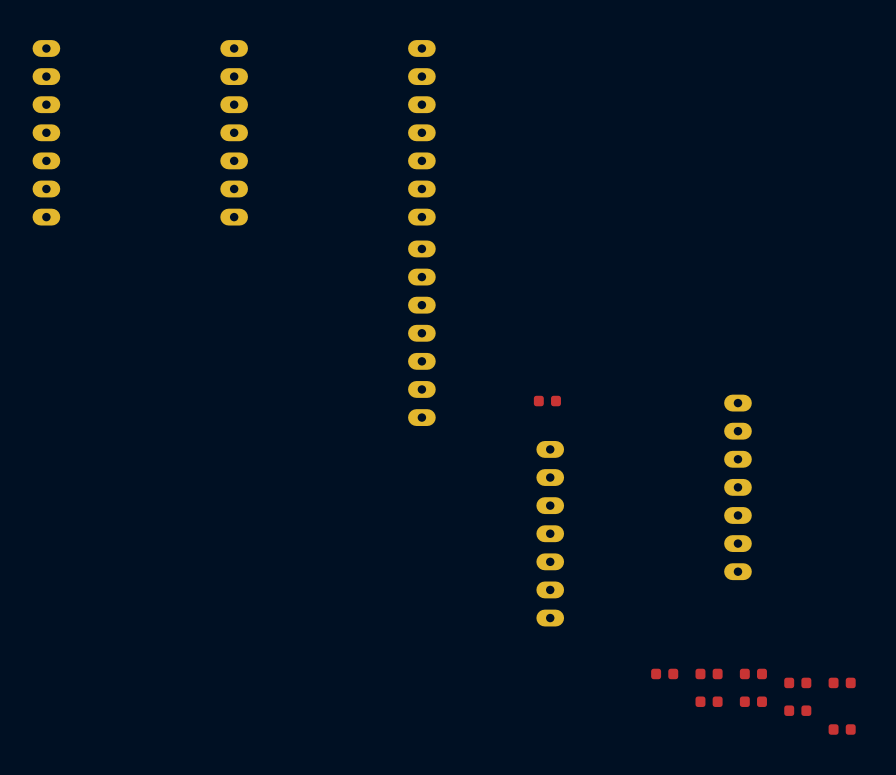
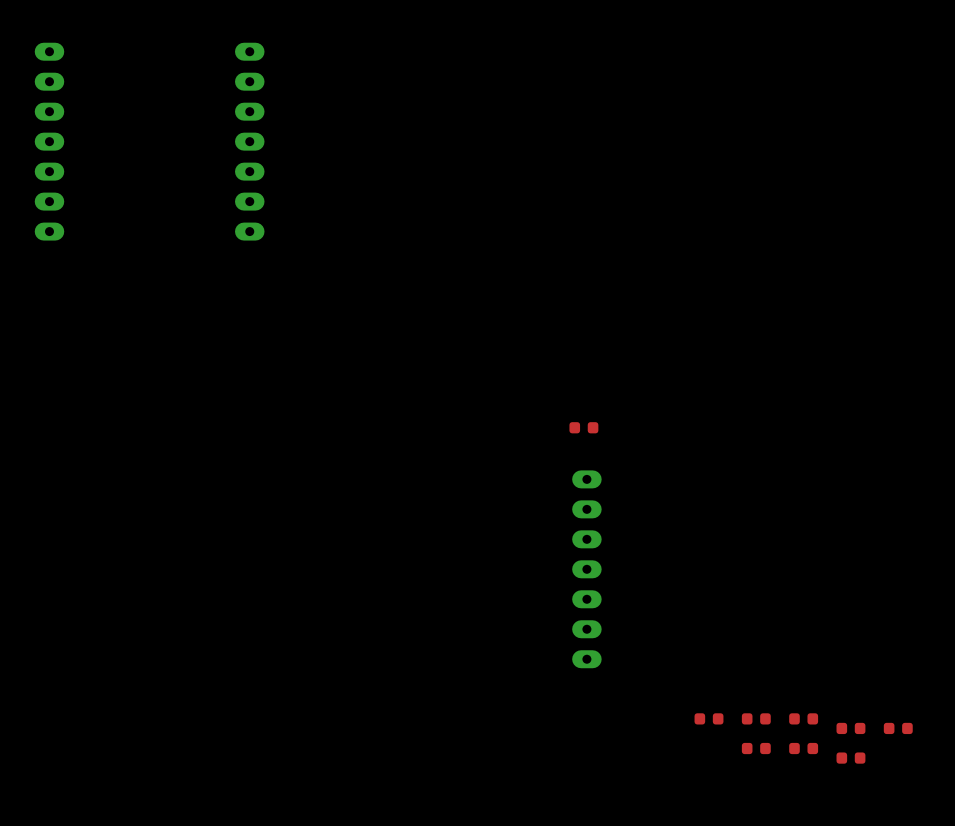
part: (421, 132) -> none
part: (421, 333) -> none
part: (737, 487) -> none
part: (842, 729) -> none

